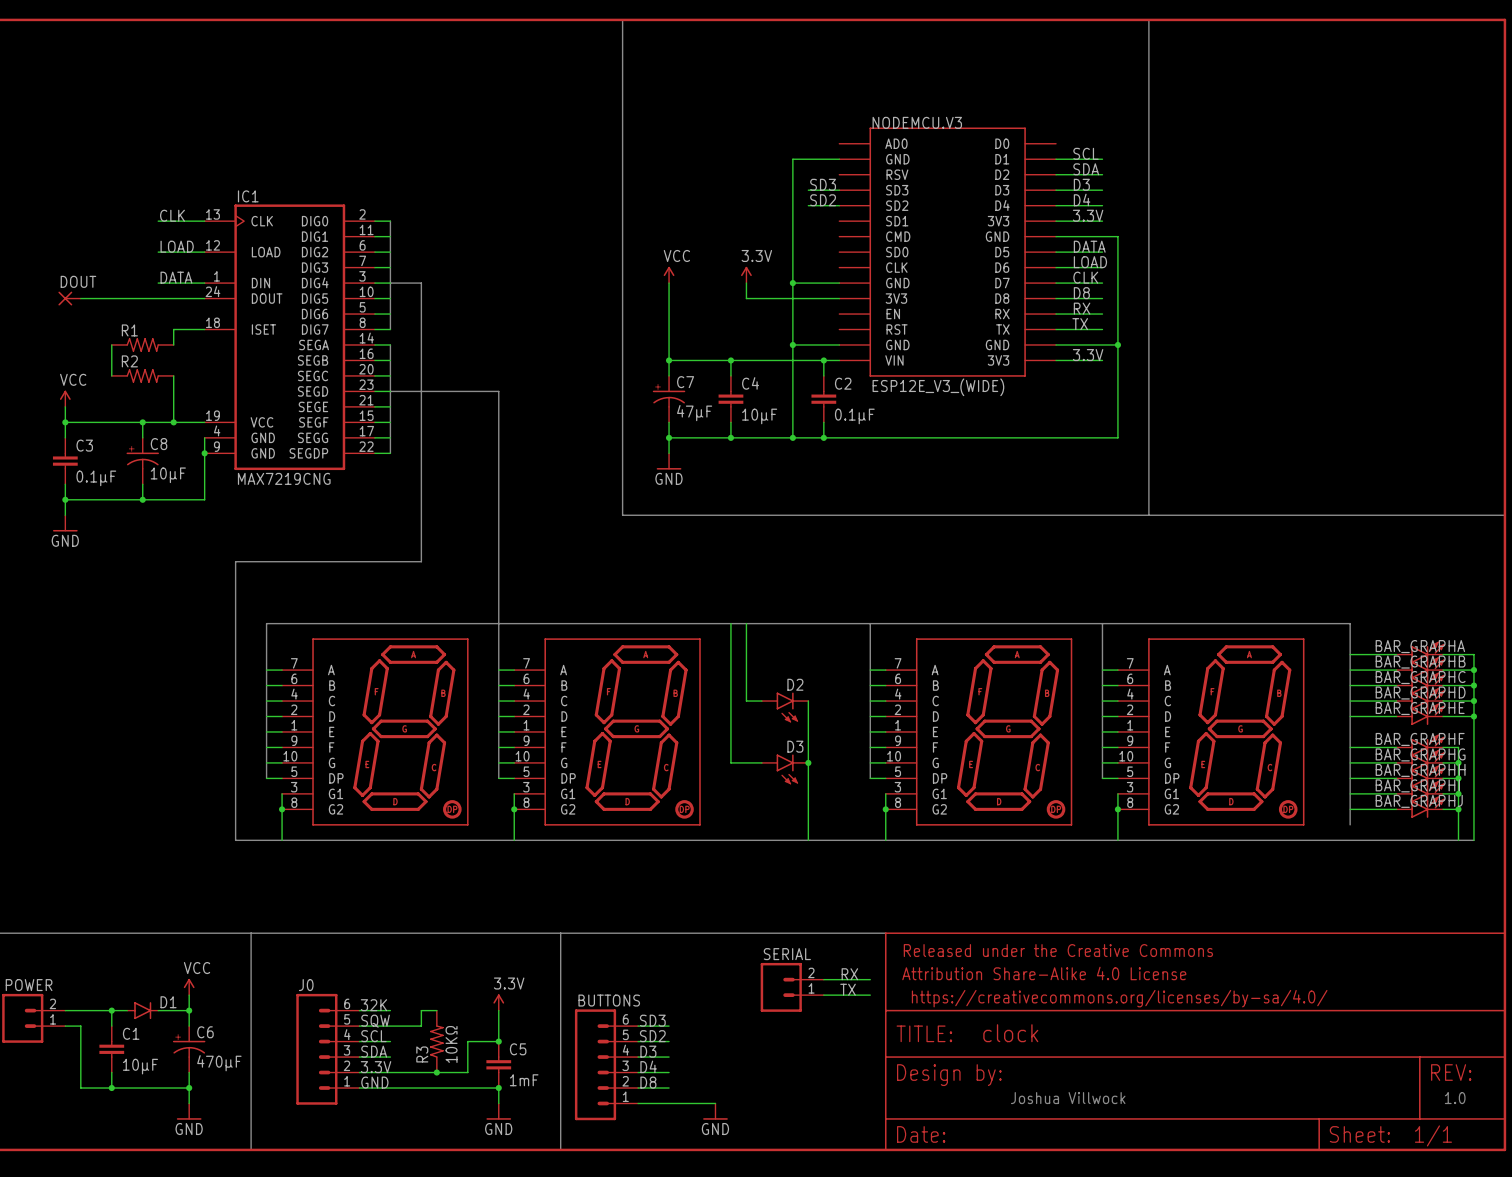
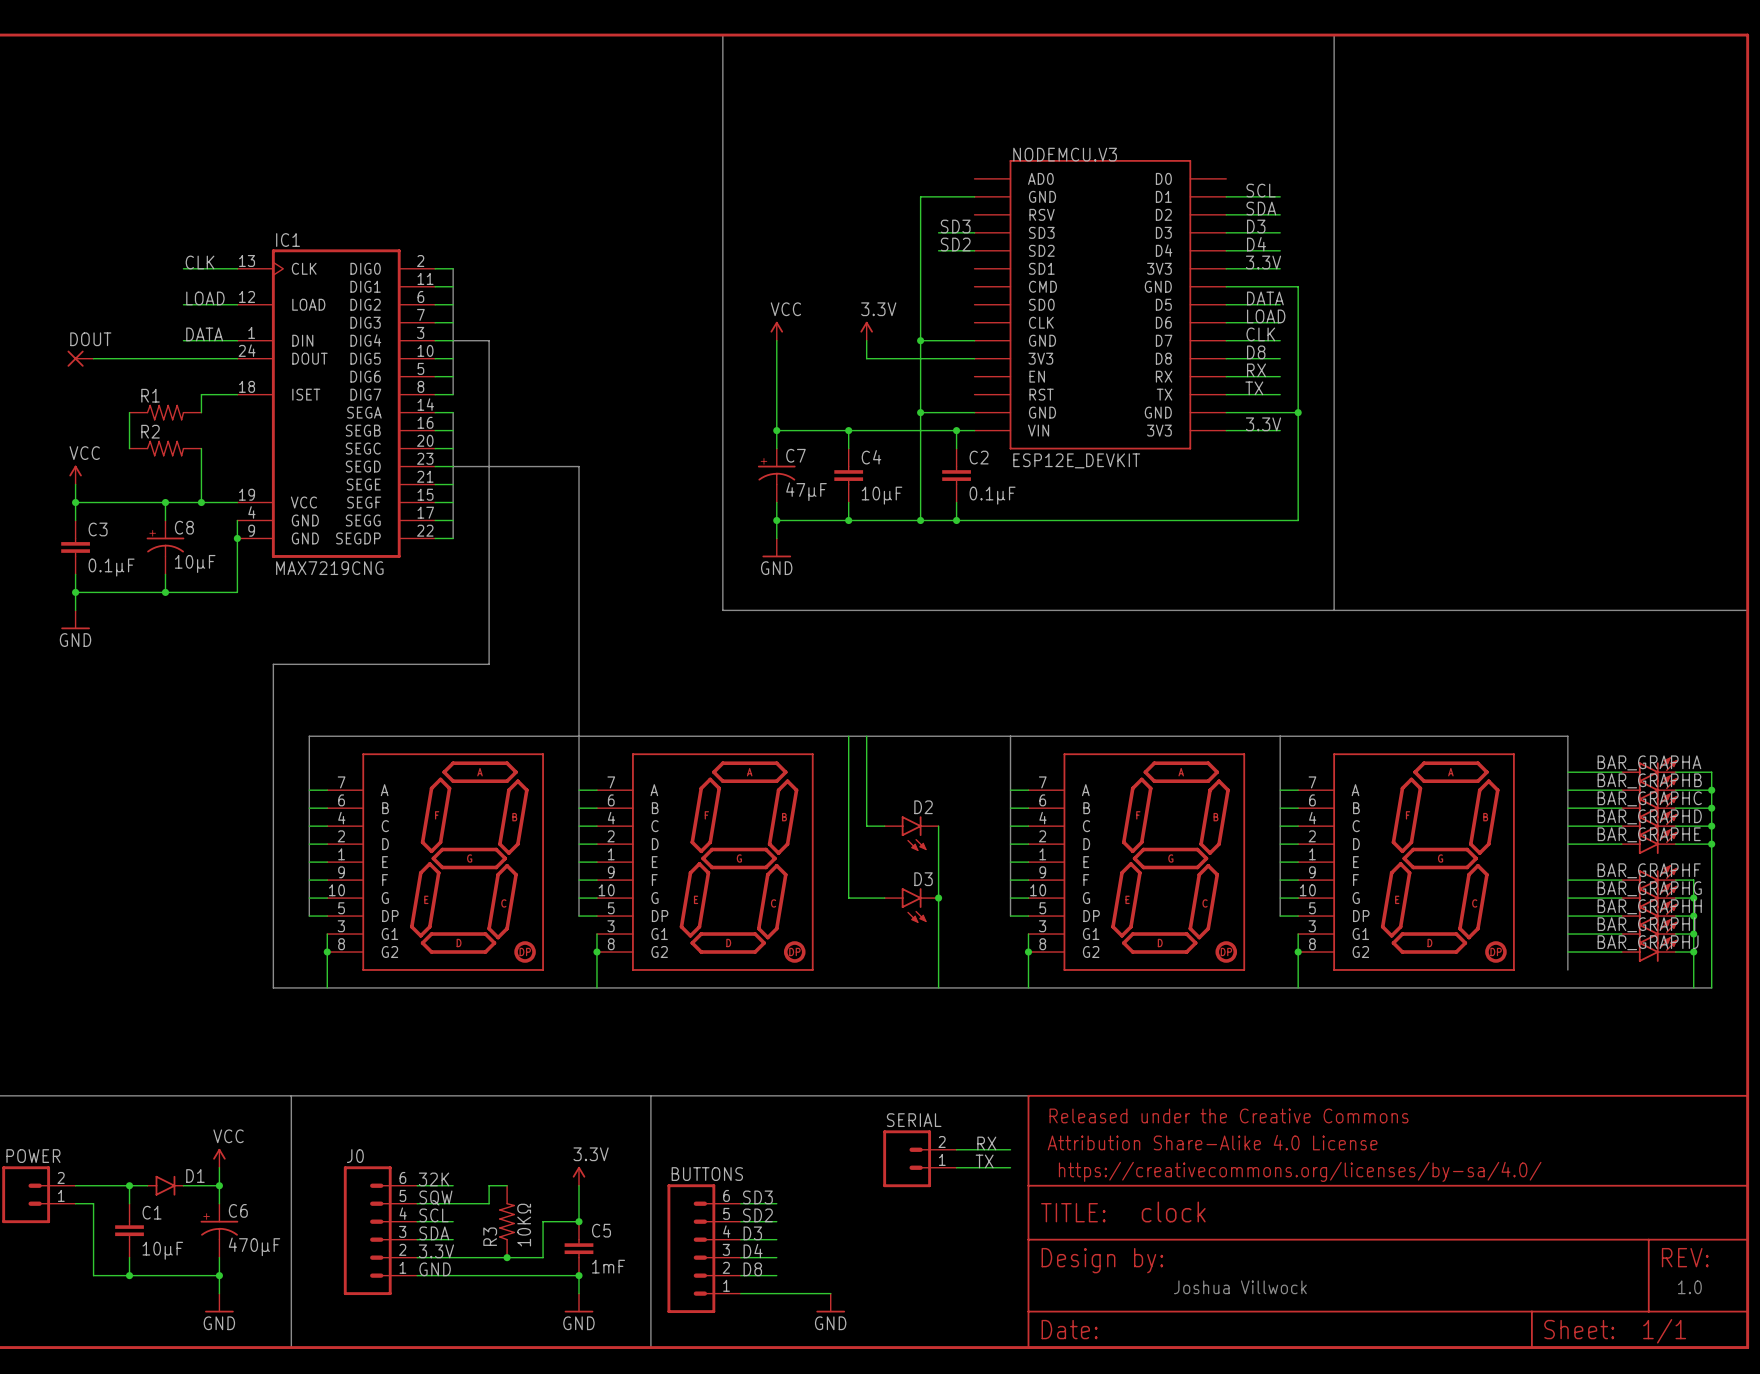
NODEMCU.V3 value: ESP12E_V3_(WIDE) (938, 387) -> ESP12E_DEVKIT (1076, 460)

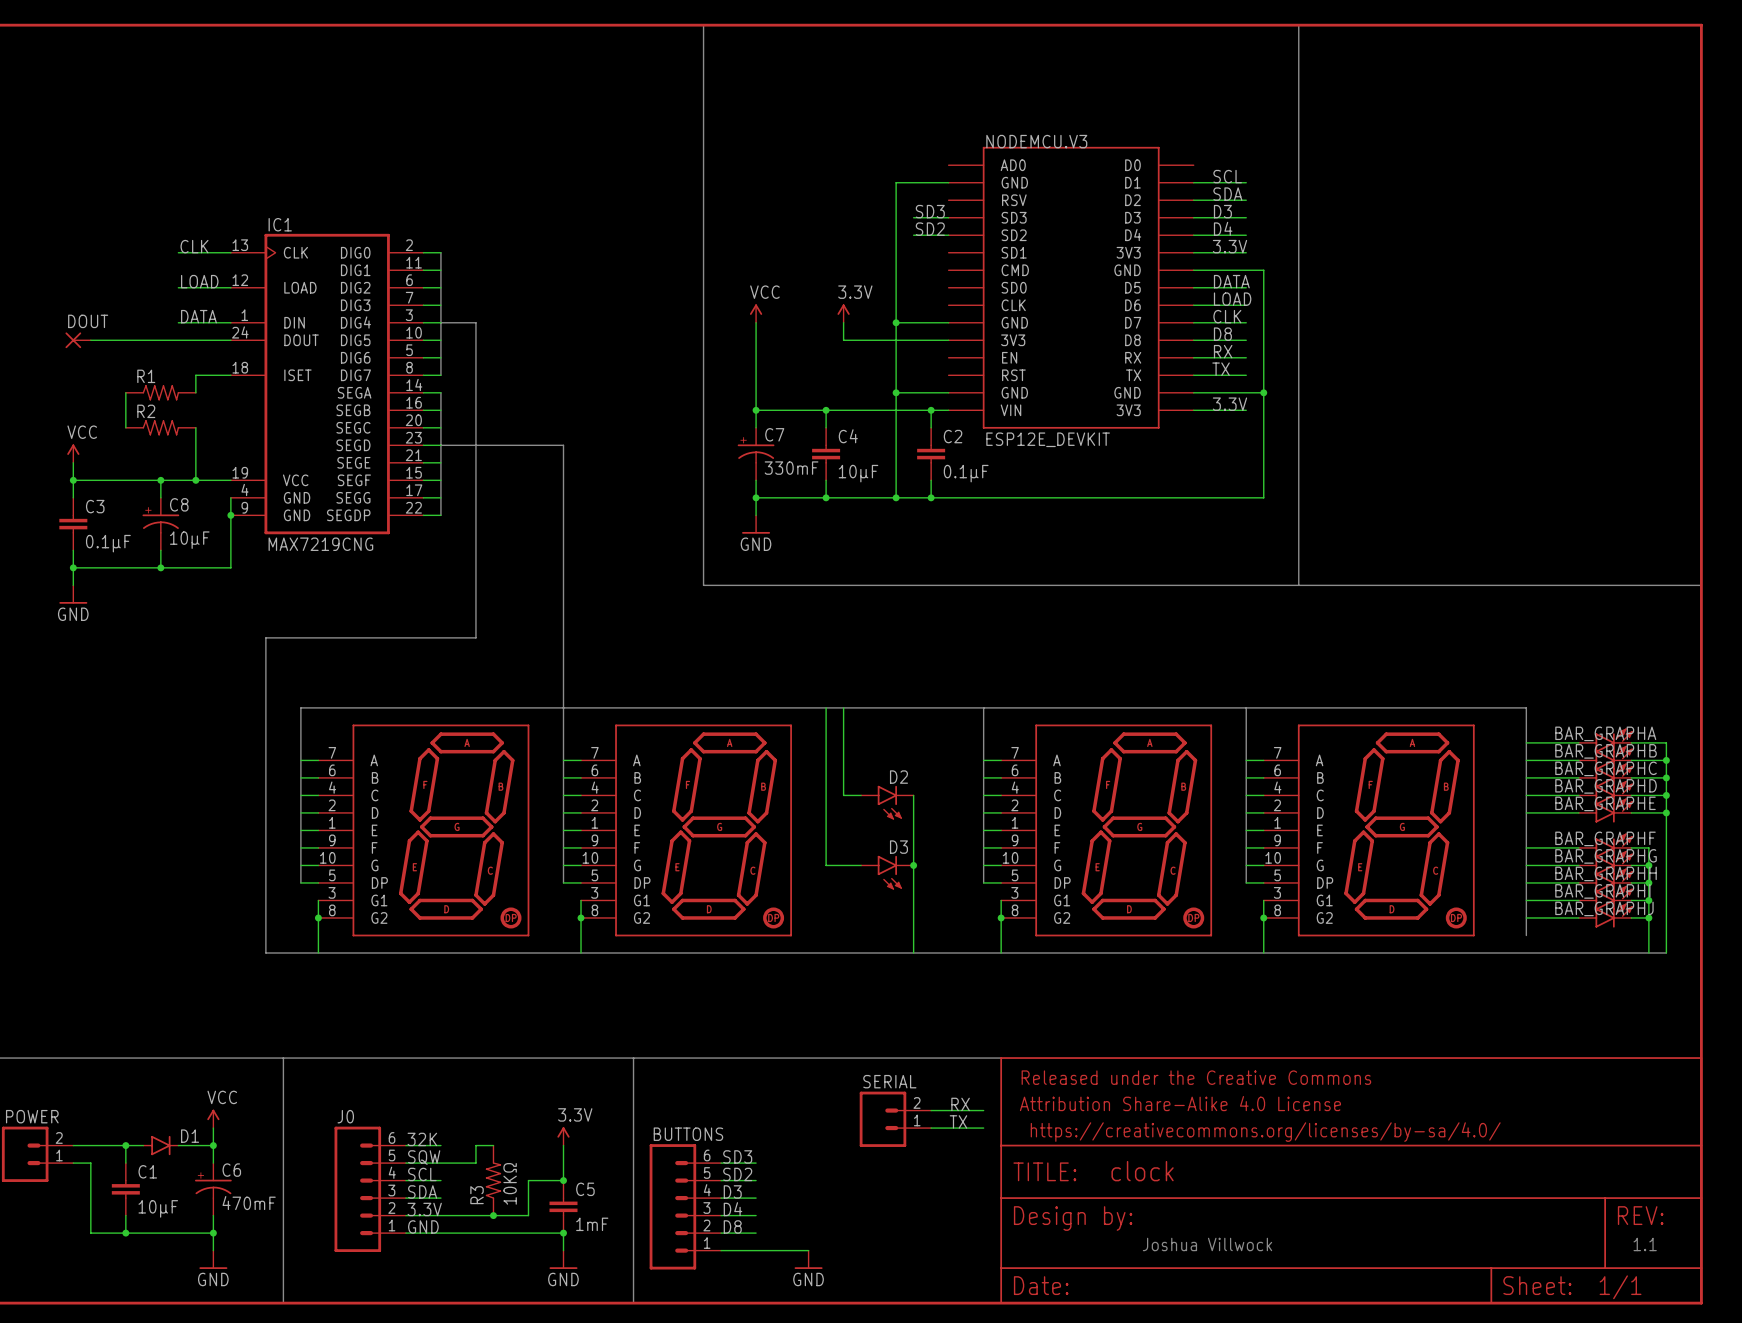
C7 value: 47μF (806, 491) -> 330mF (791, 468)
C6 value: 470μF (254, 1246) -> 470mF (249, 1203)
text: 1.0 (1689, 1287) -> 1.1 (1645, 1244)

